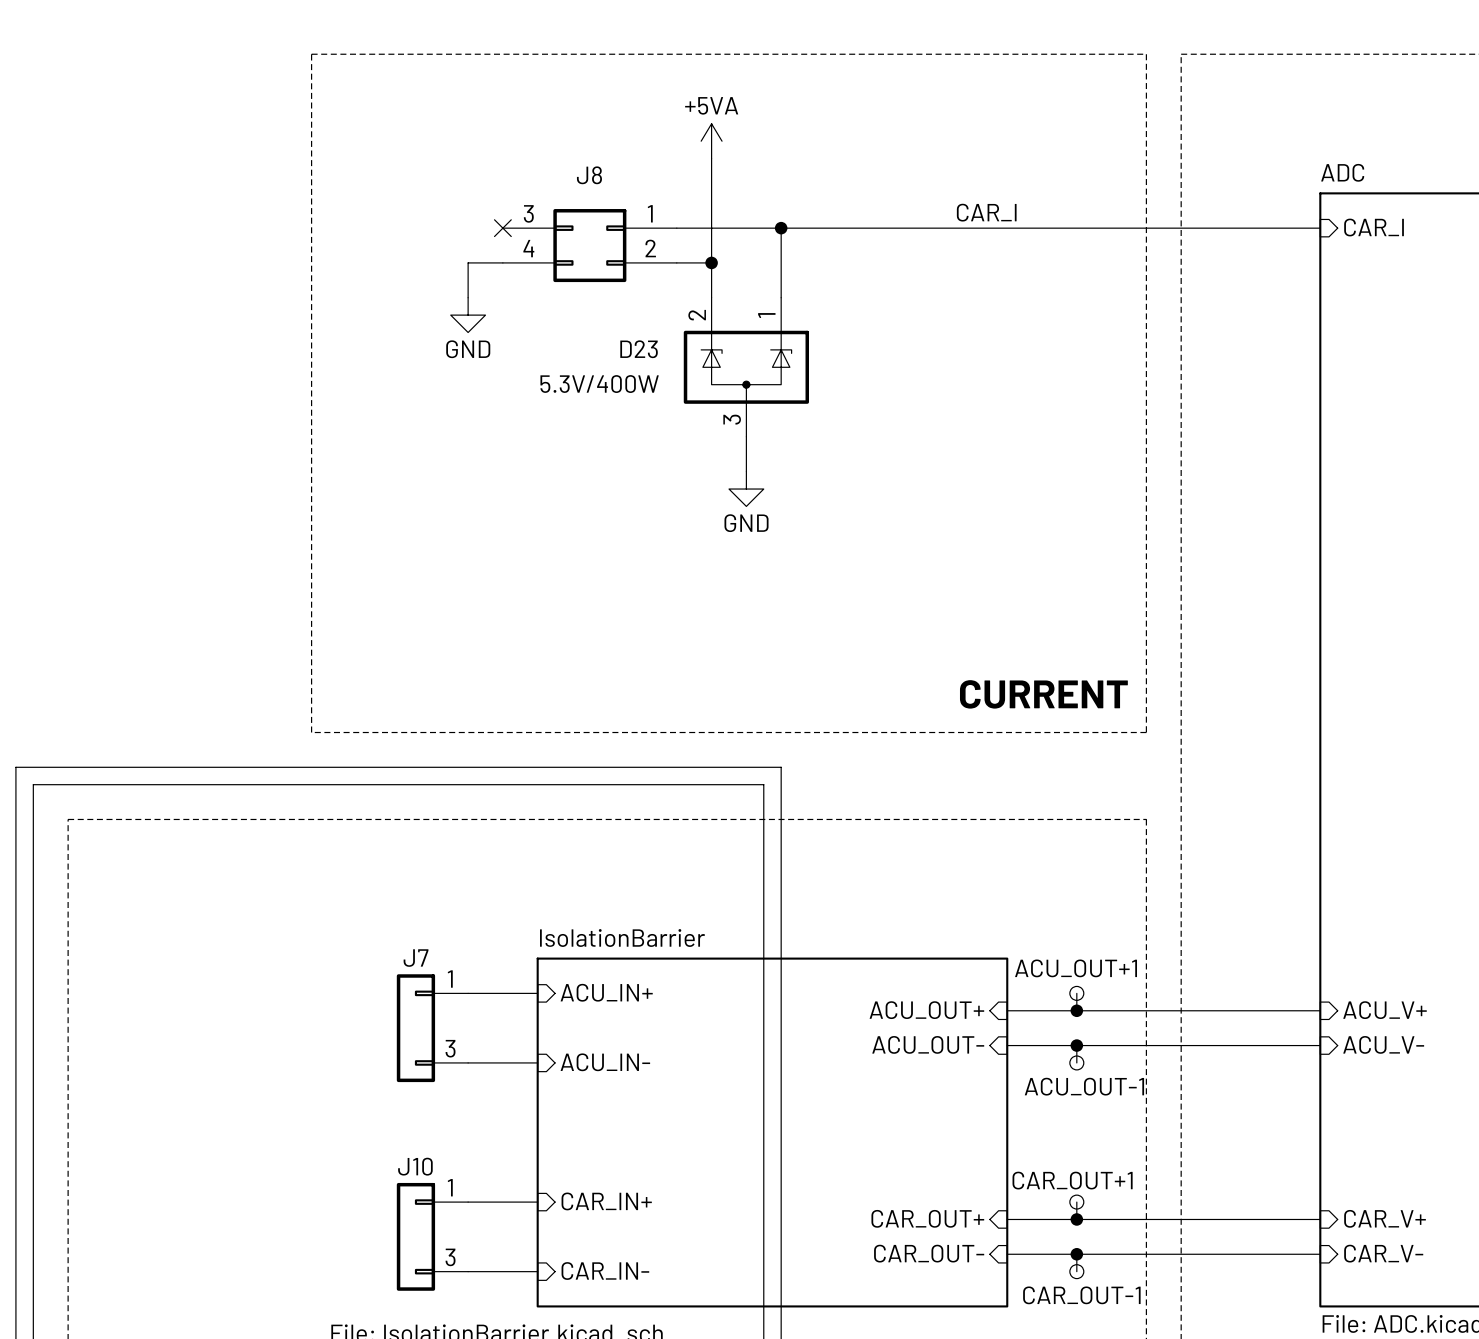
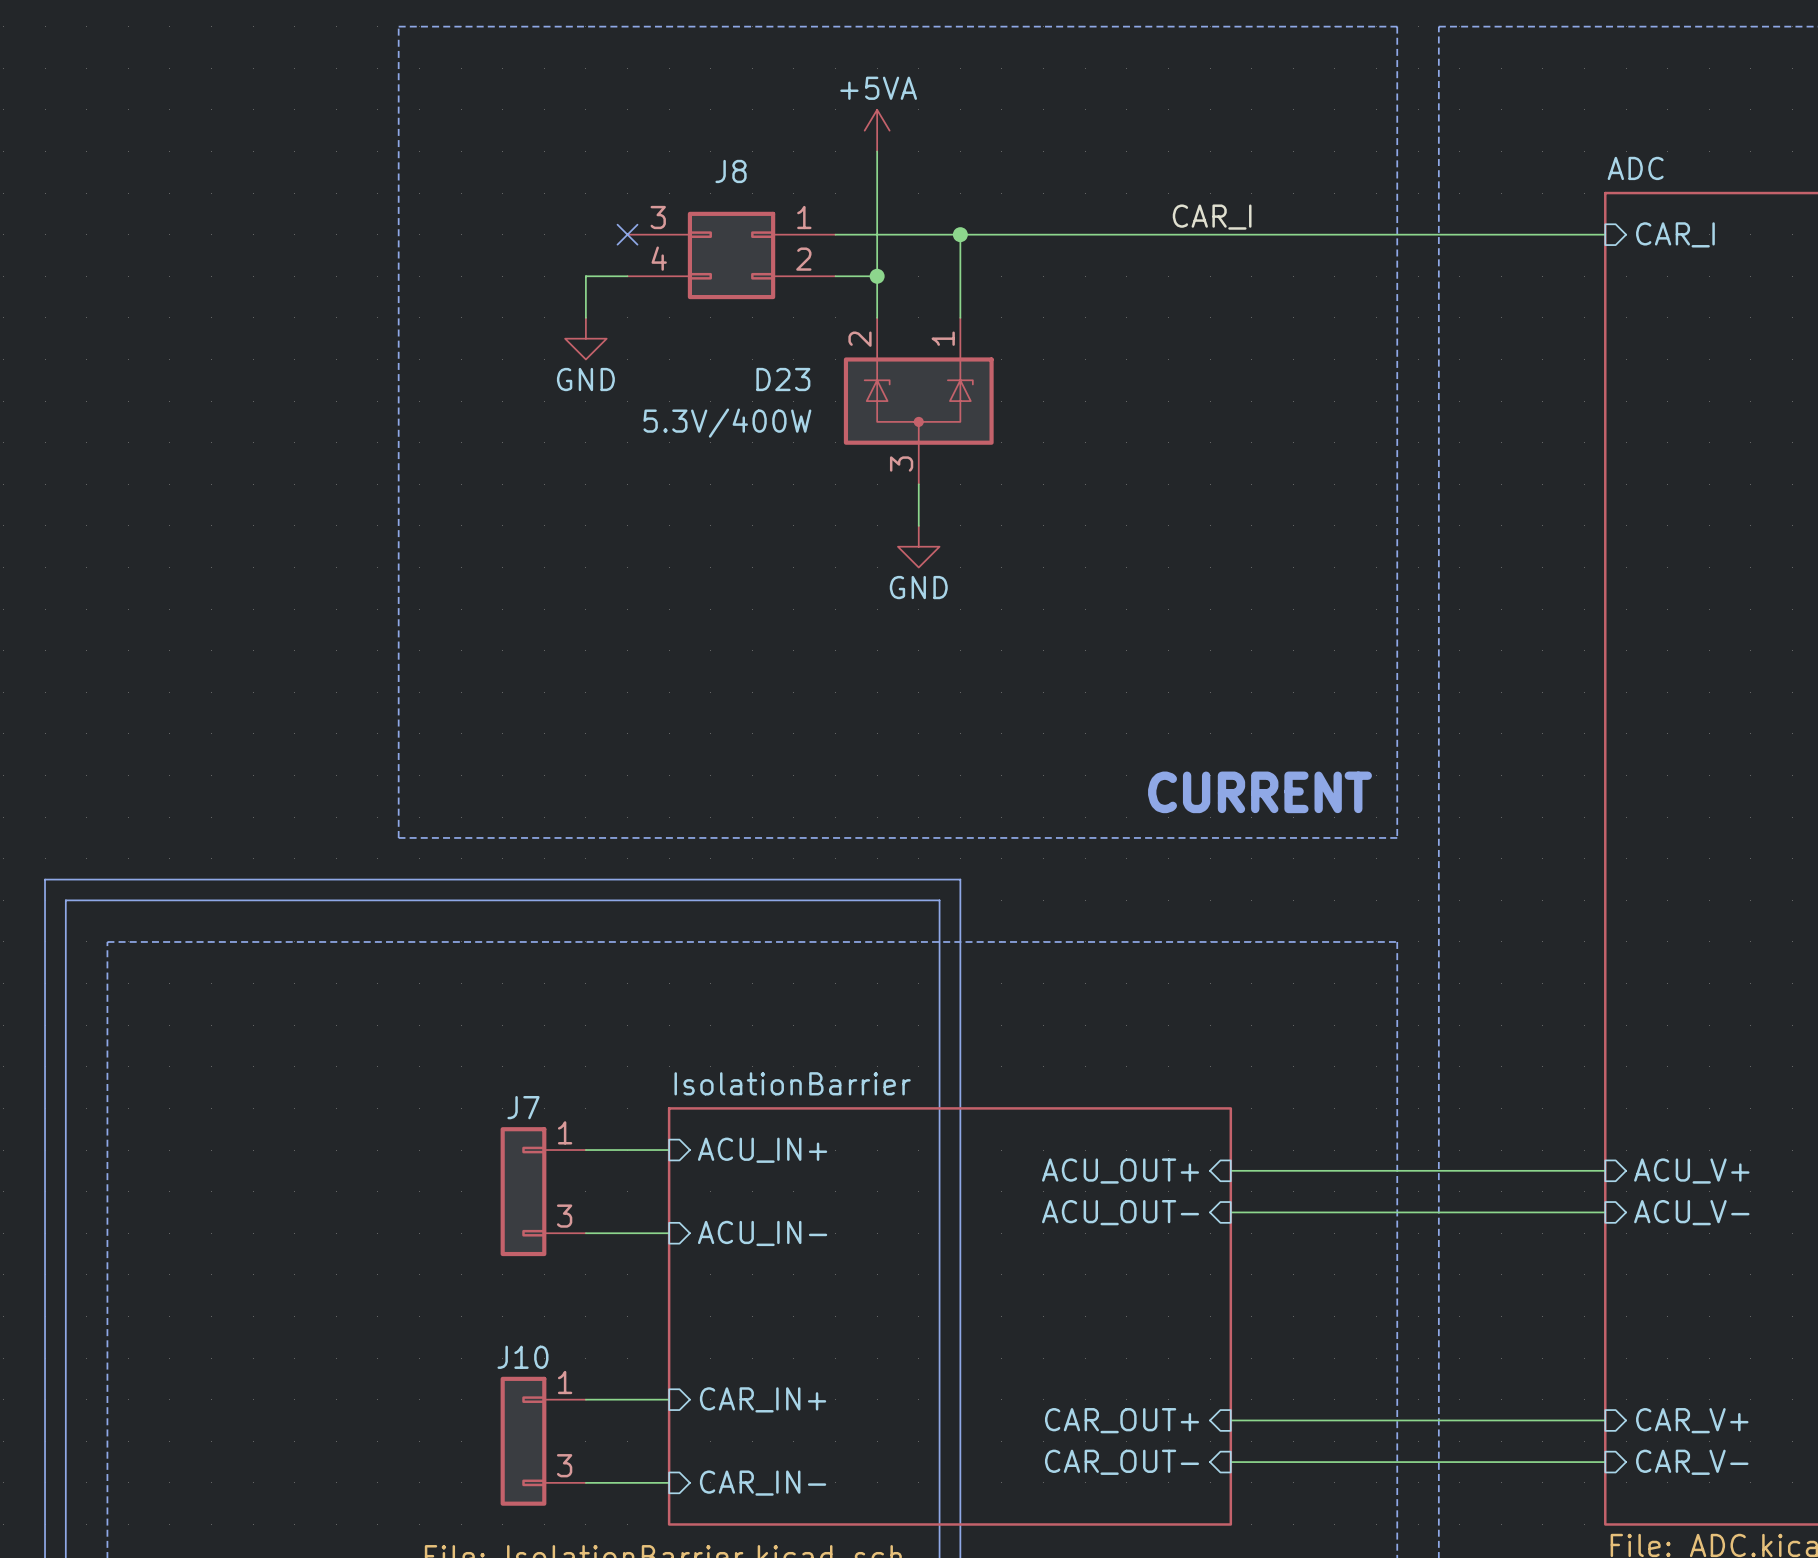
wire: (1076, 993) (1076, 1010) -> none
ACU_OUT+1: (1076, 993) -> none
junction: (1076, 1010) -> none
wire: (1076, 1045) (1076, 1062) -> none
junction: (1076, 1045) -> none
ACU_OUT-1: (1076, 1062) -> none
wire: (1076, 1202) (1076, 1219) -> none
CAR_OUT+1: (1076, 1202) -> none
junction: (1076, 1219) -> none
wire: (1076, 1254) (1076, 1271) -> none
junction: (1076, 1254) -> none
CAR_OUT-1: (1076, 1271) -> none

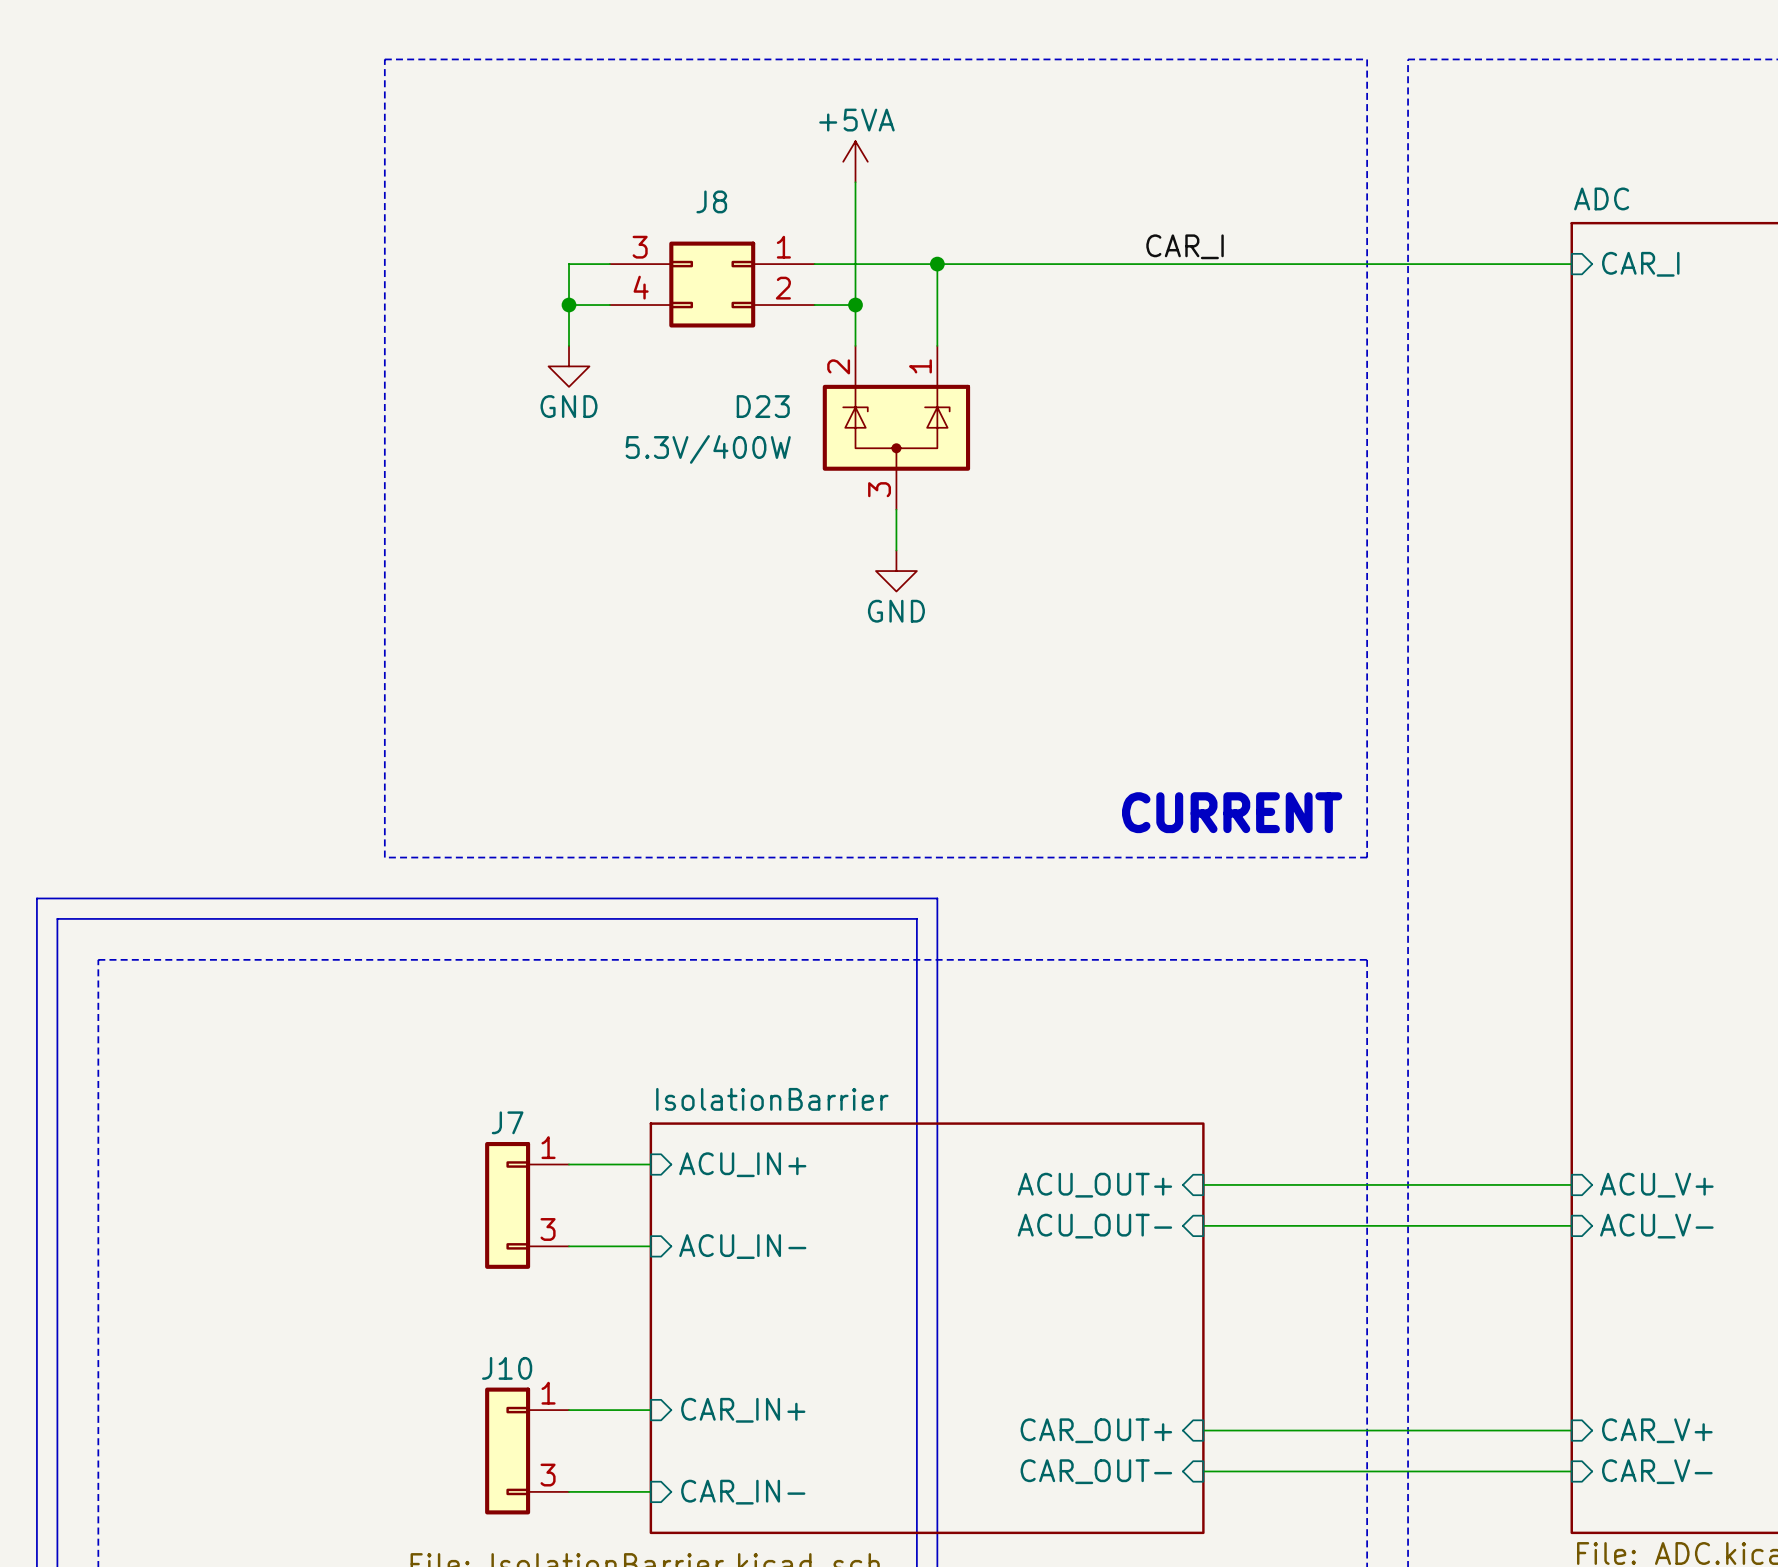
wire: none -> (609, 264) (569, 264) (569, 305)
no-connect mark: (627, 234) -> none
junction: none -> (569, 305)

